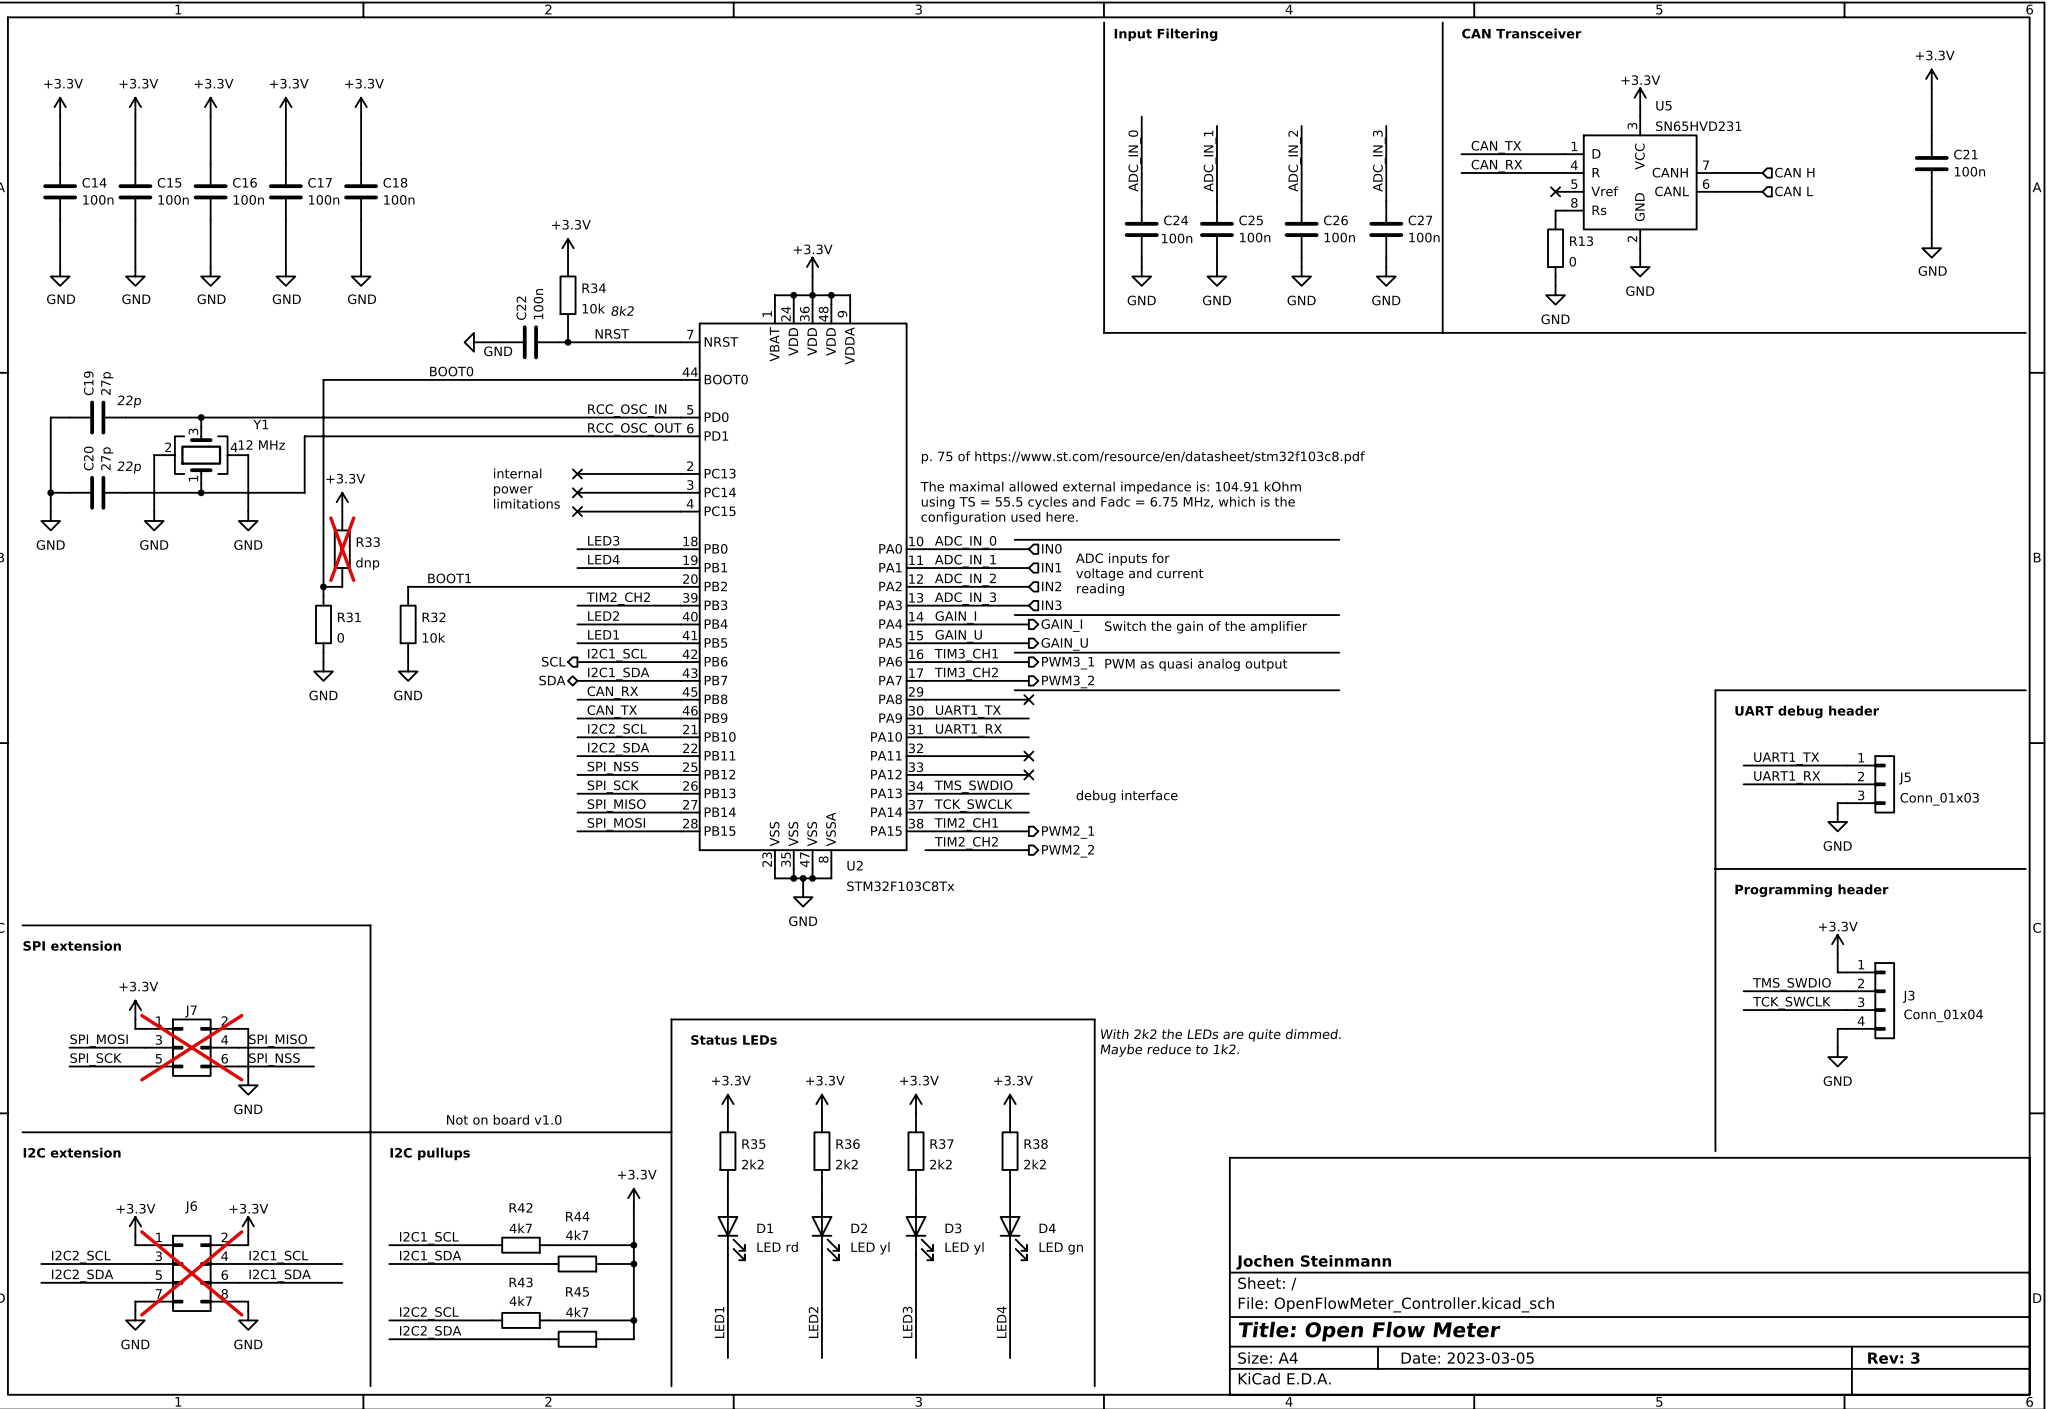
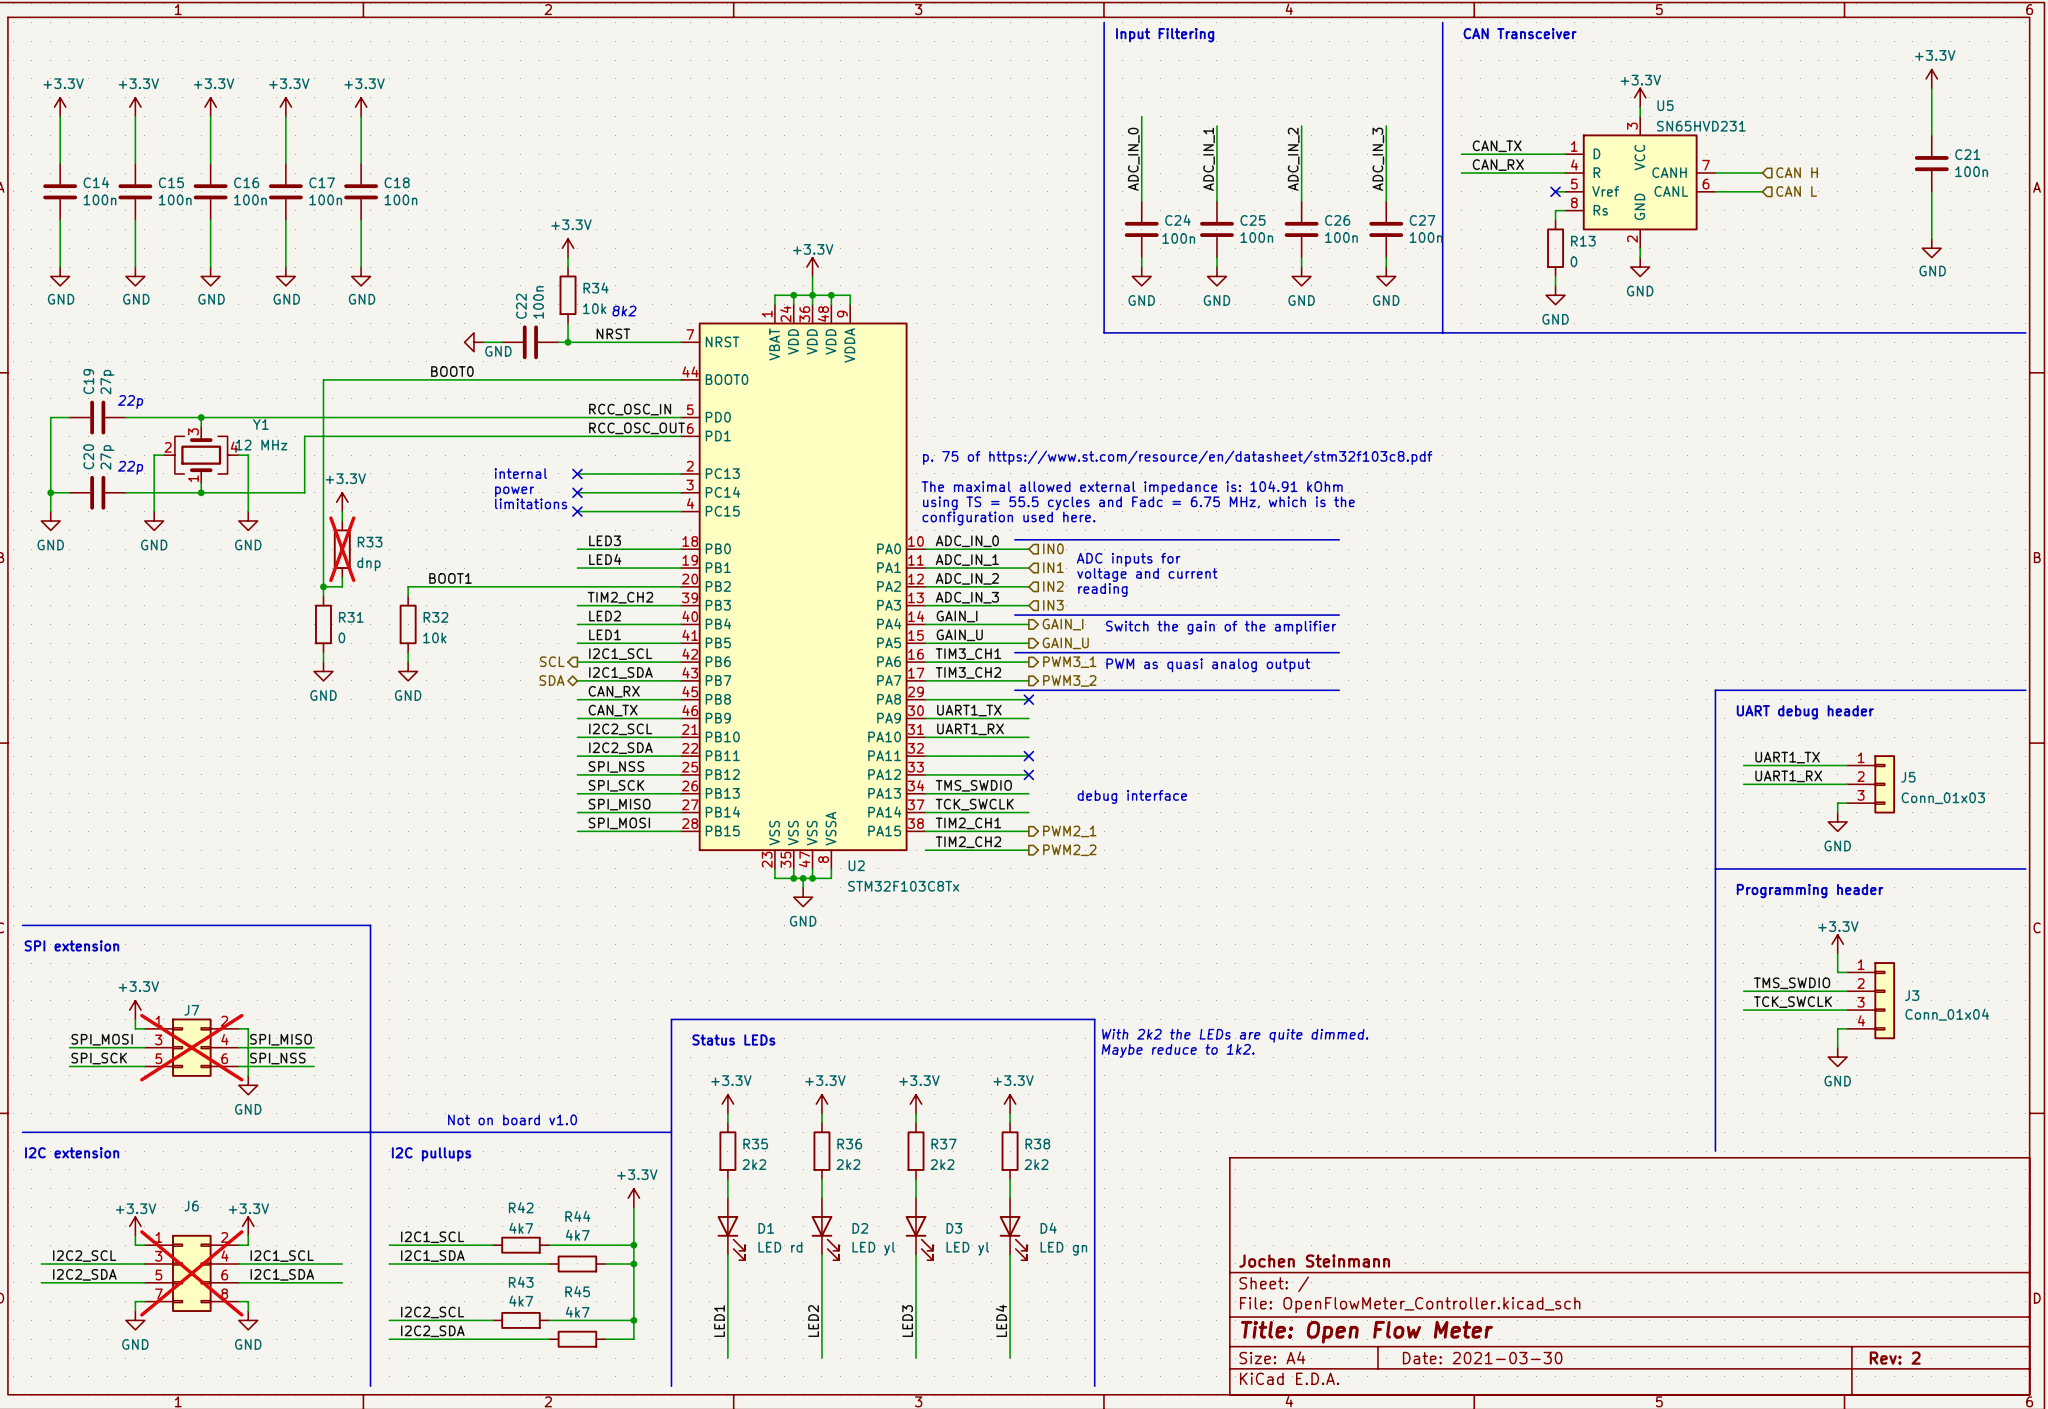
title block: Date: 2023-03-05 (1467, 1358) -> Date: 2021-03-30 (1482, 1358)
title block: Rev: 3 (1893, 1358) -> Rev: 2 (1895, 1358)

